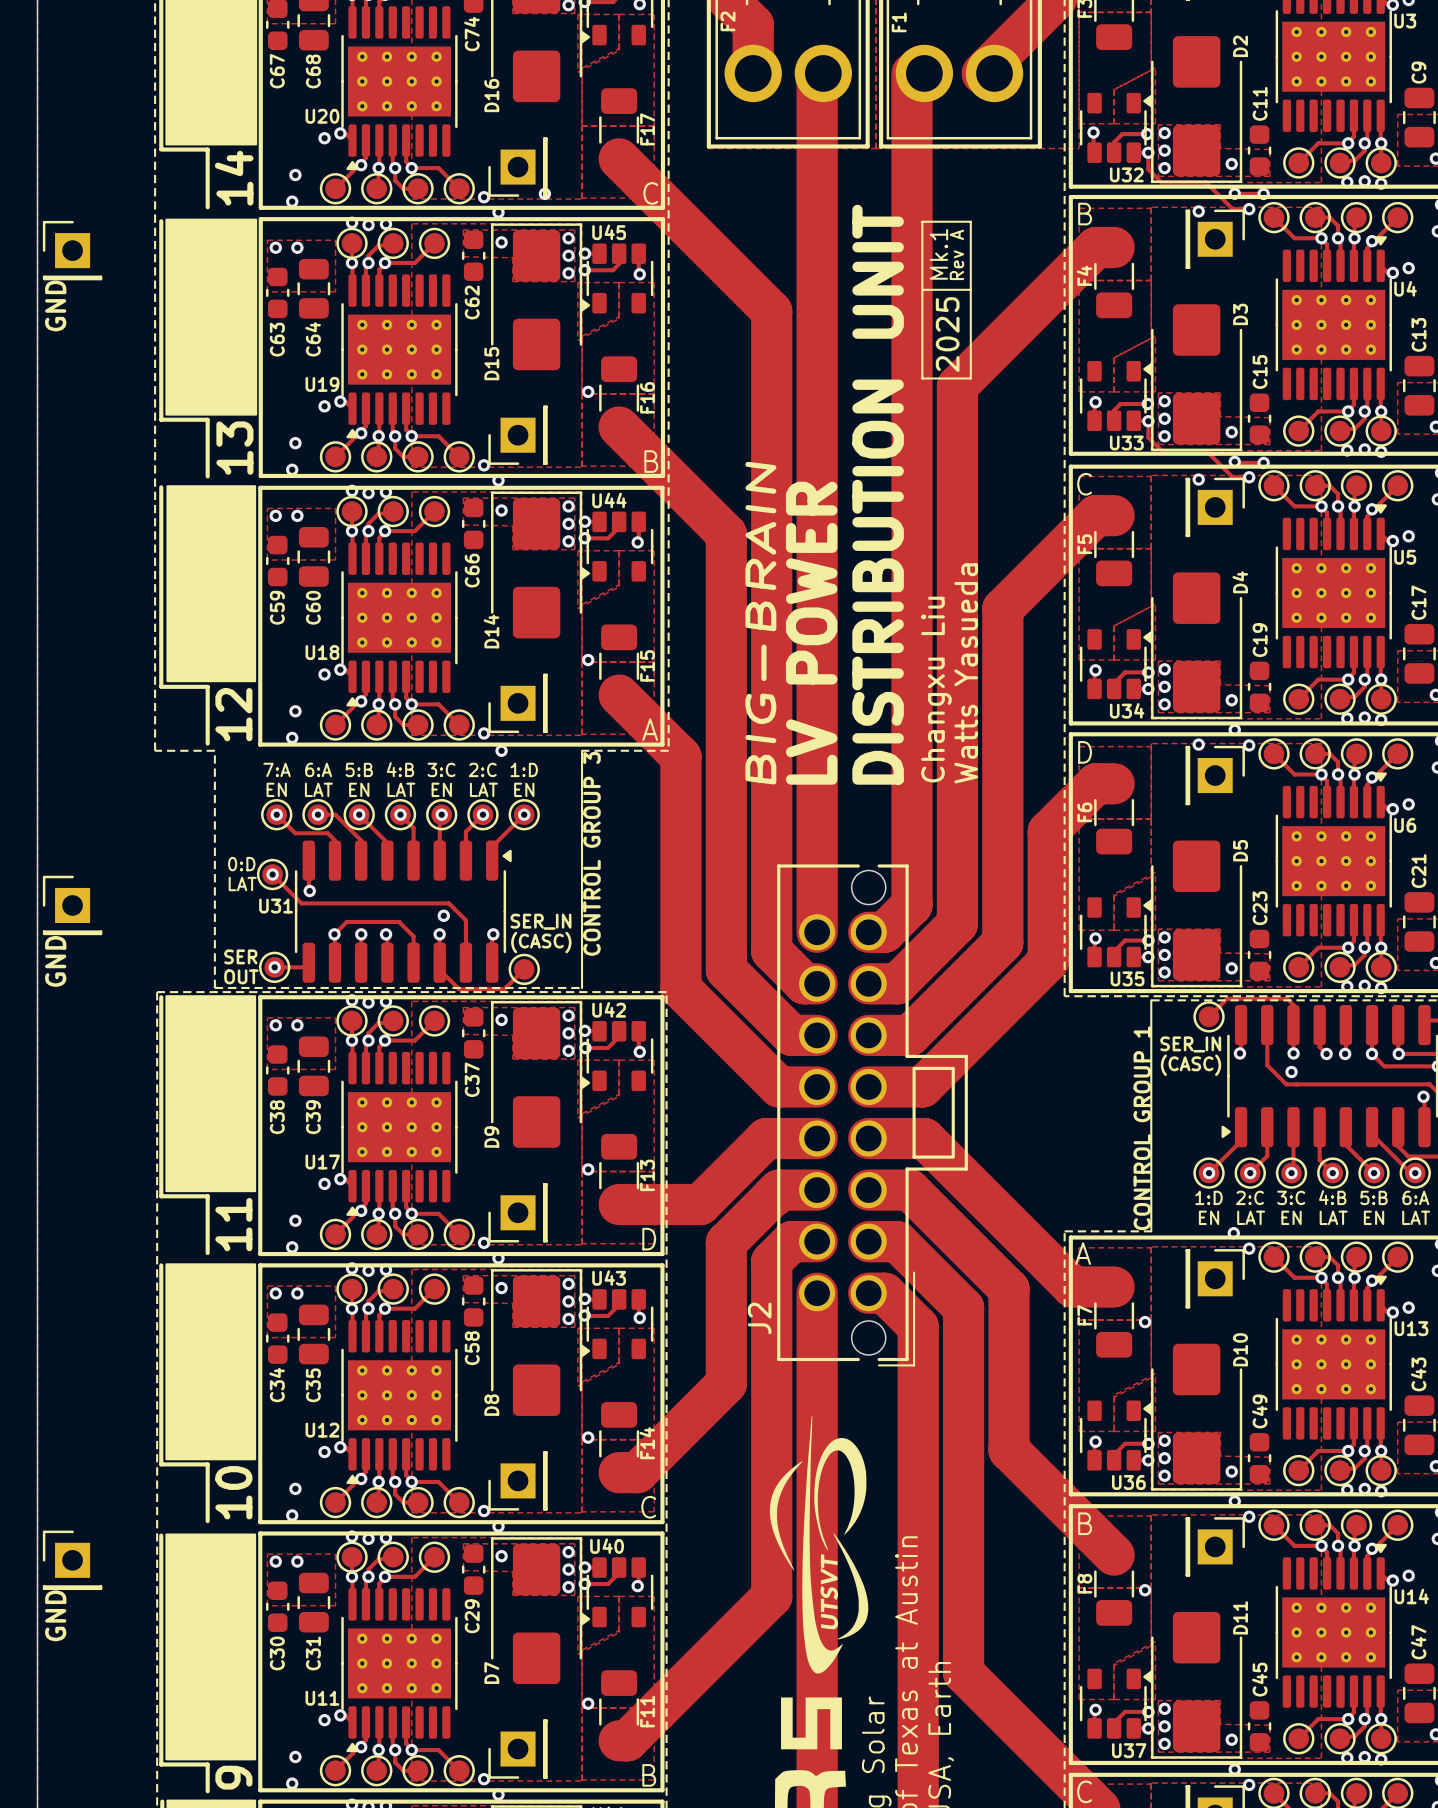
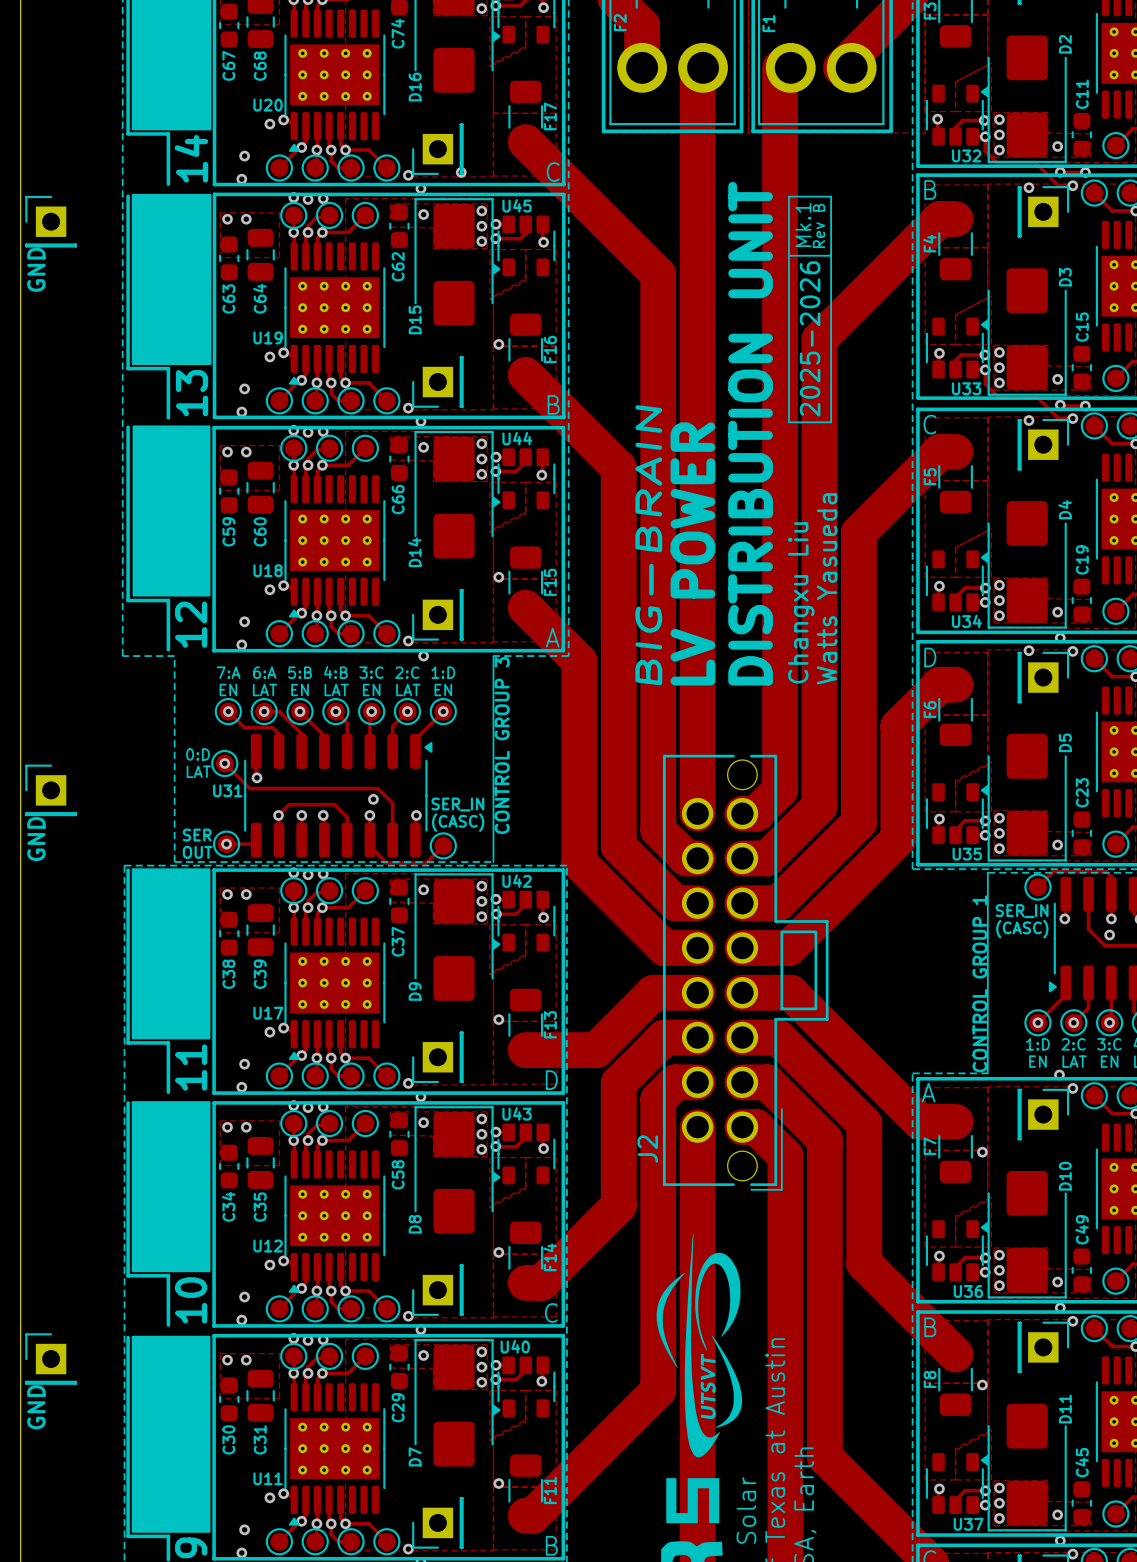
text: Rev A (956, 254) -> Rev B (819, 225)
text: 2025 (947, 334) -> 2025-2026 (810, 338)
line: (922, 378) (970, 378) -> (789, 332) (789, 422) (831, 422) (831, 332)

